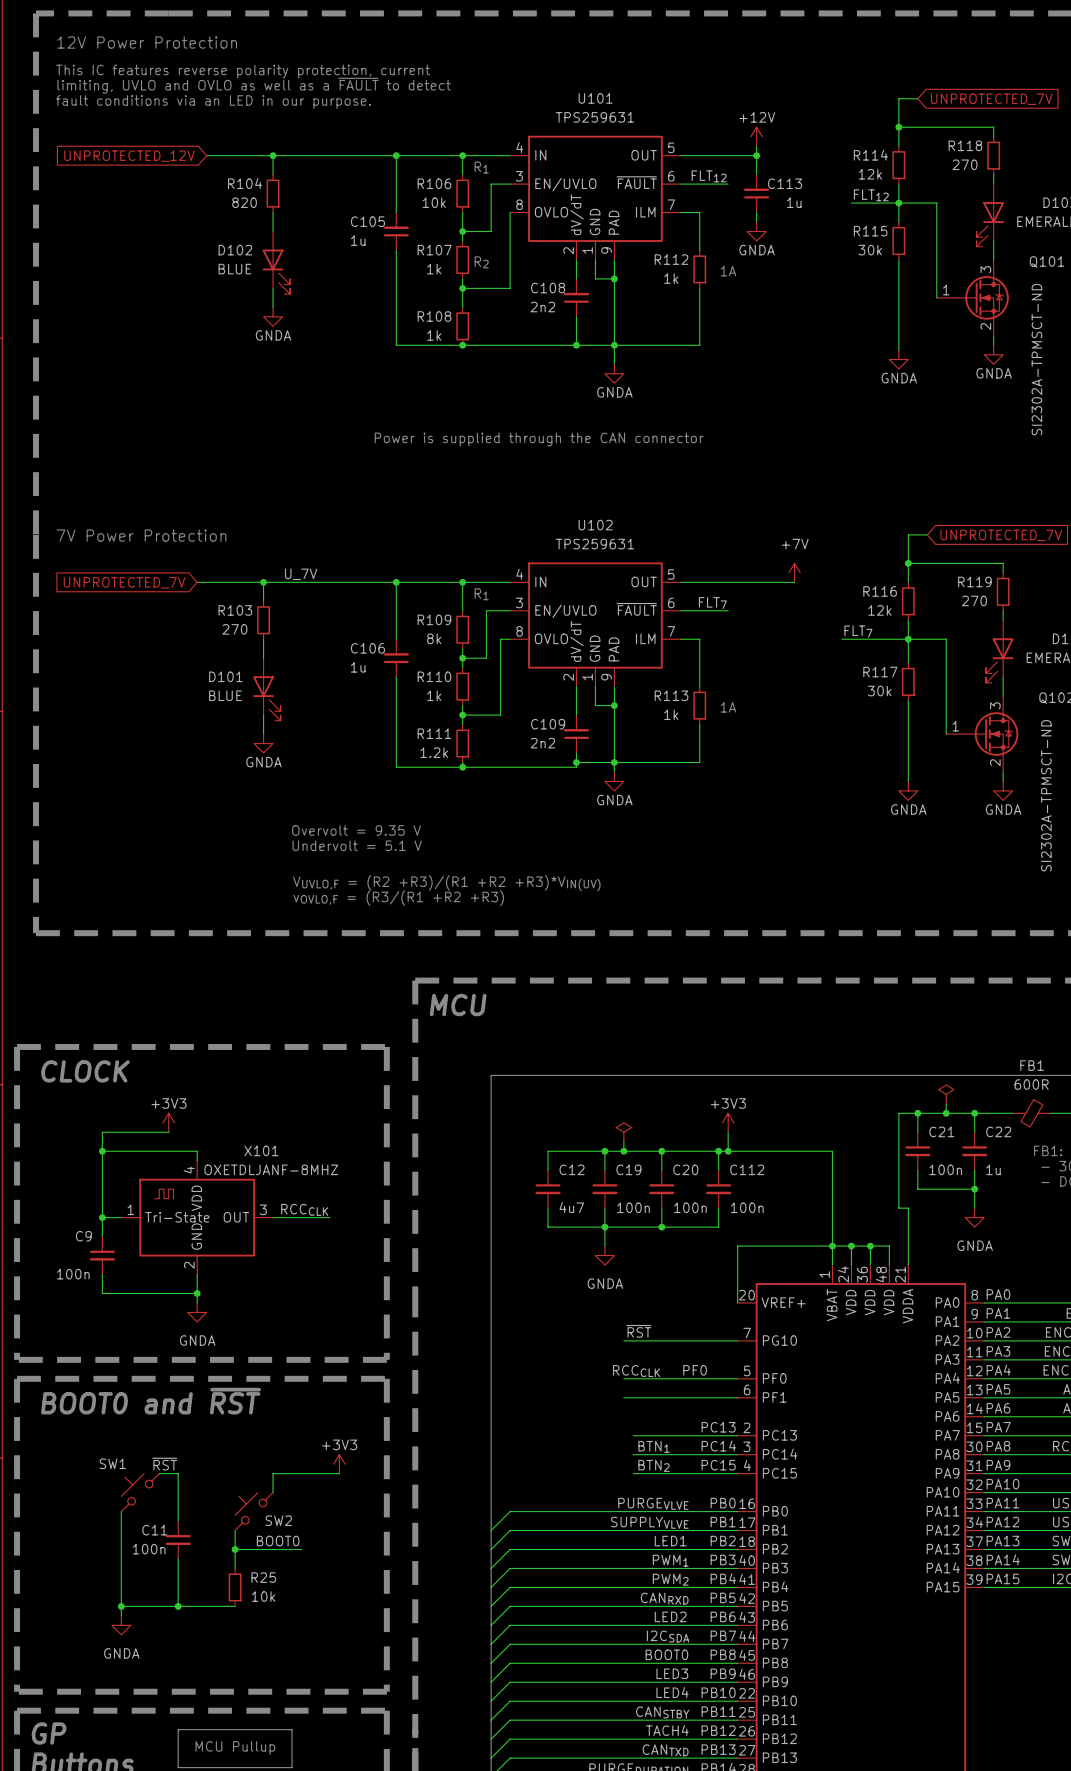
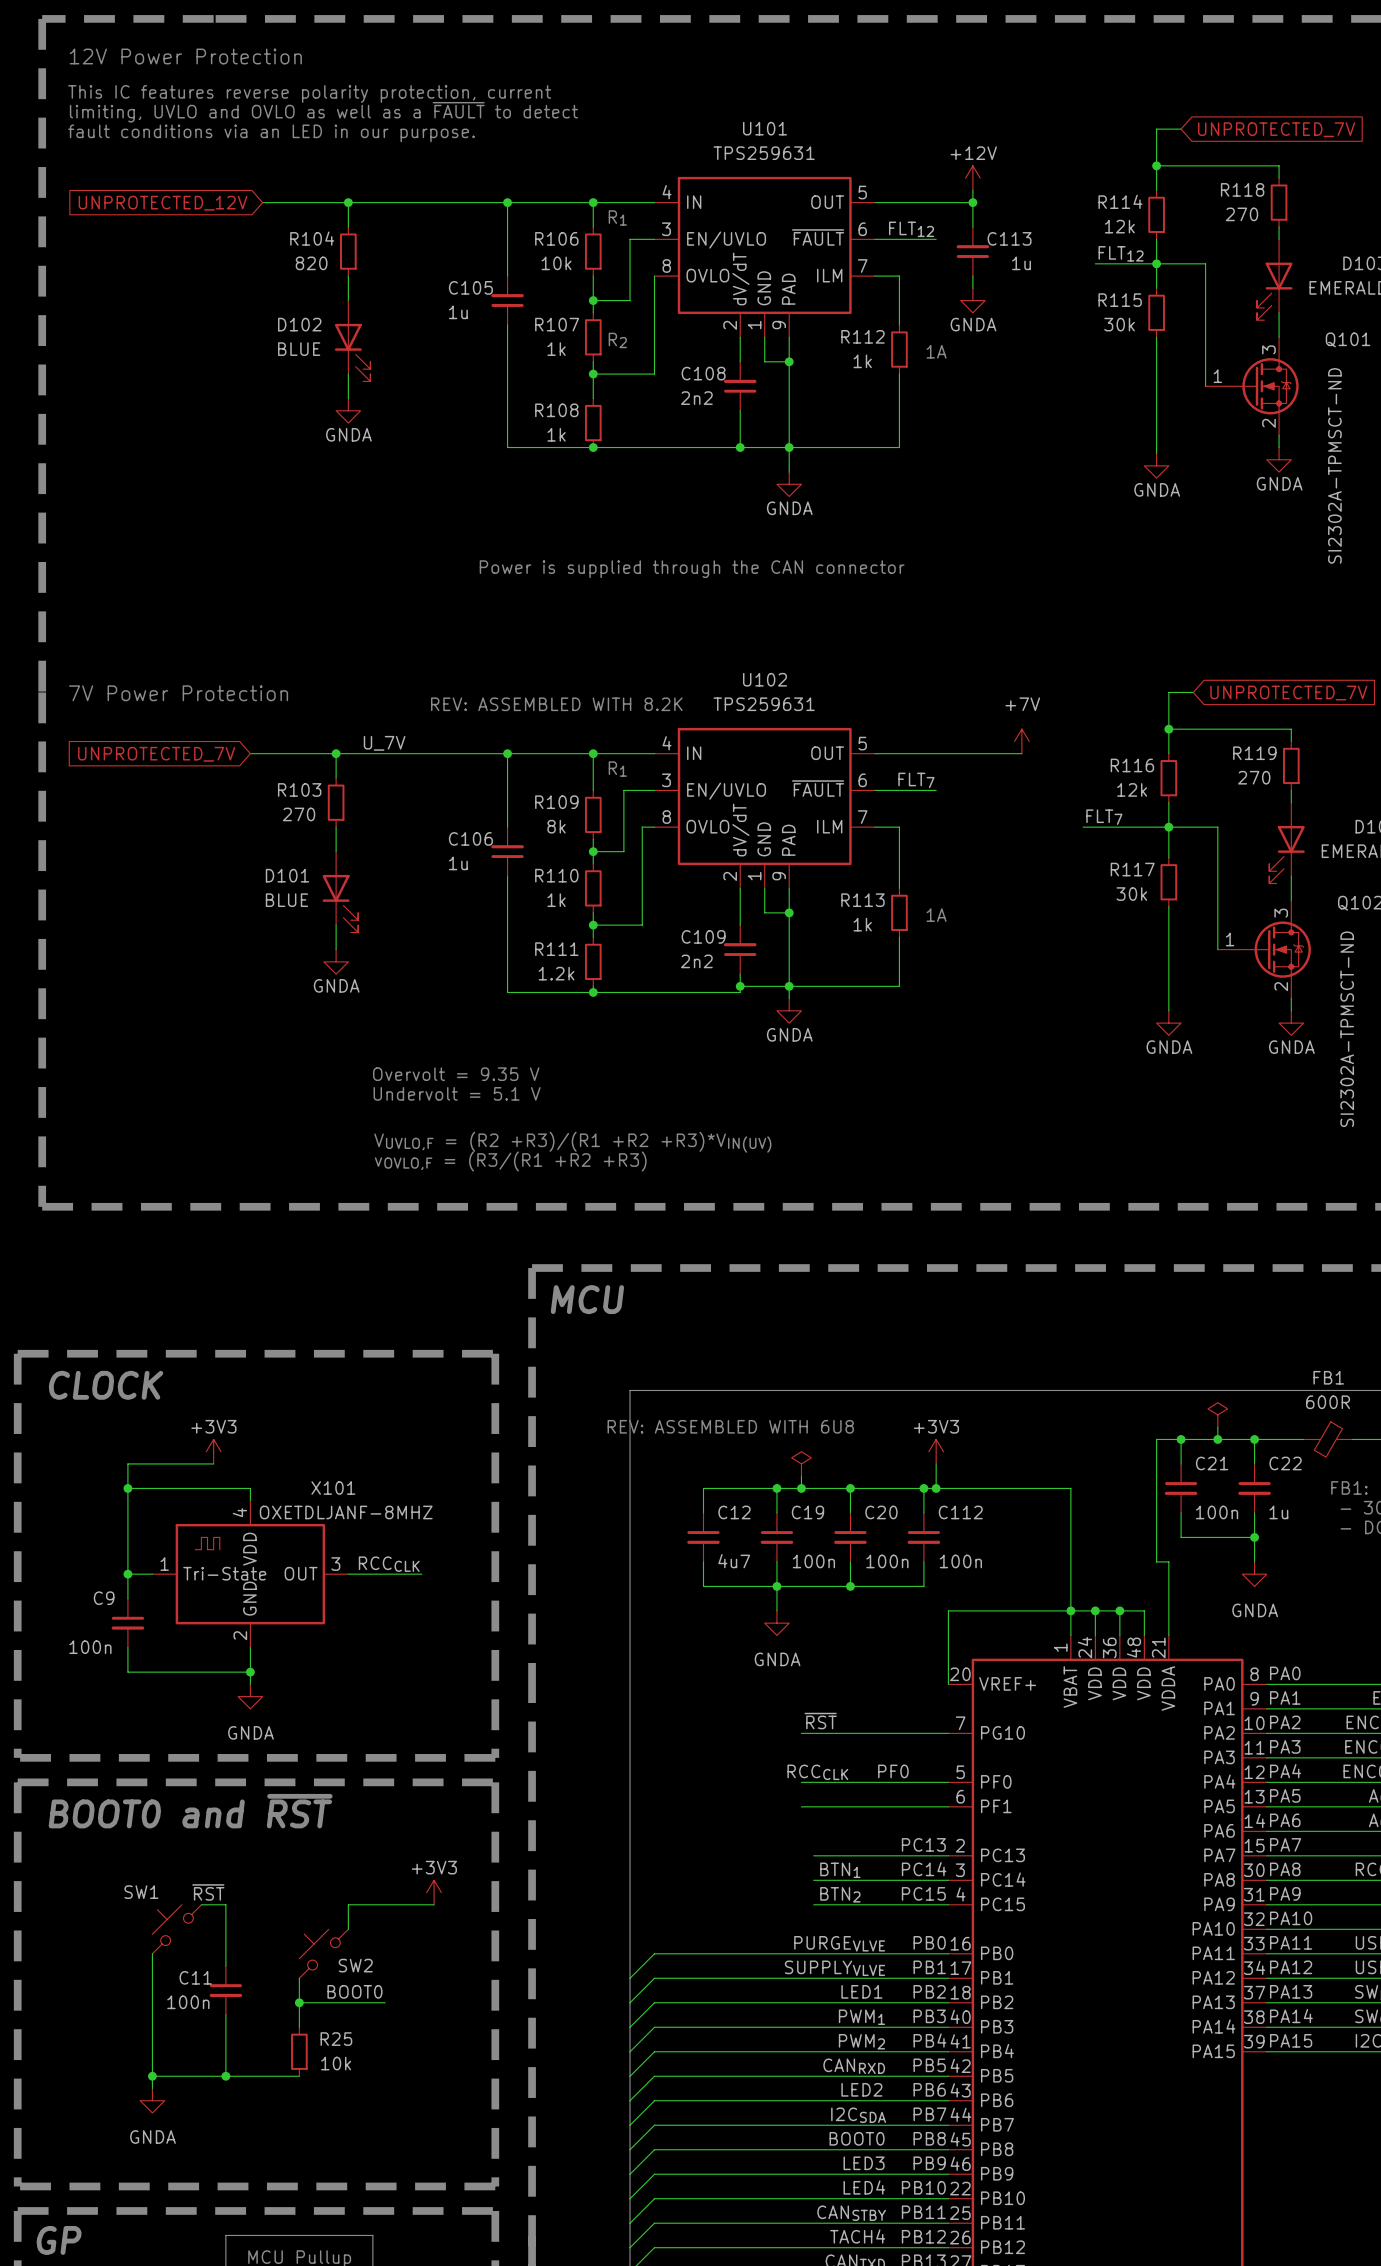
text: none -> REV: ASSEMBLED WITH 8.2K (556, 704)
text: none -> REV: ASSEMBLED WITH 6U8 (730, 1426)

